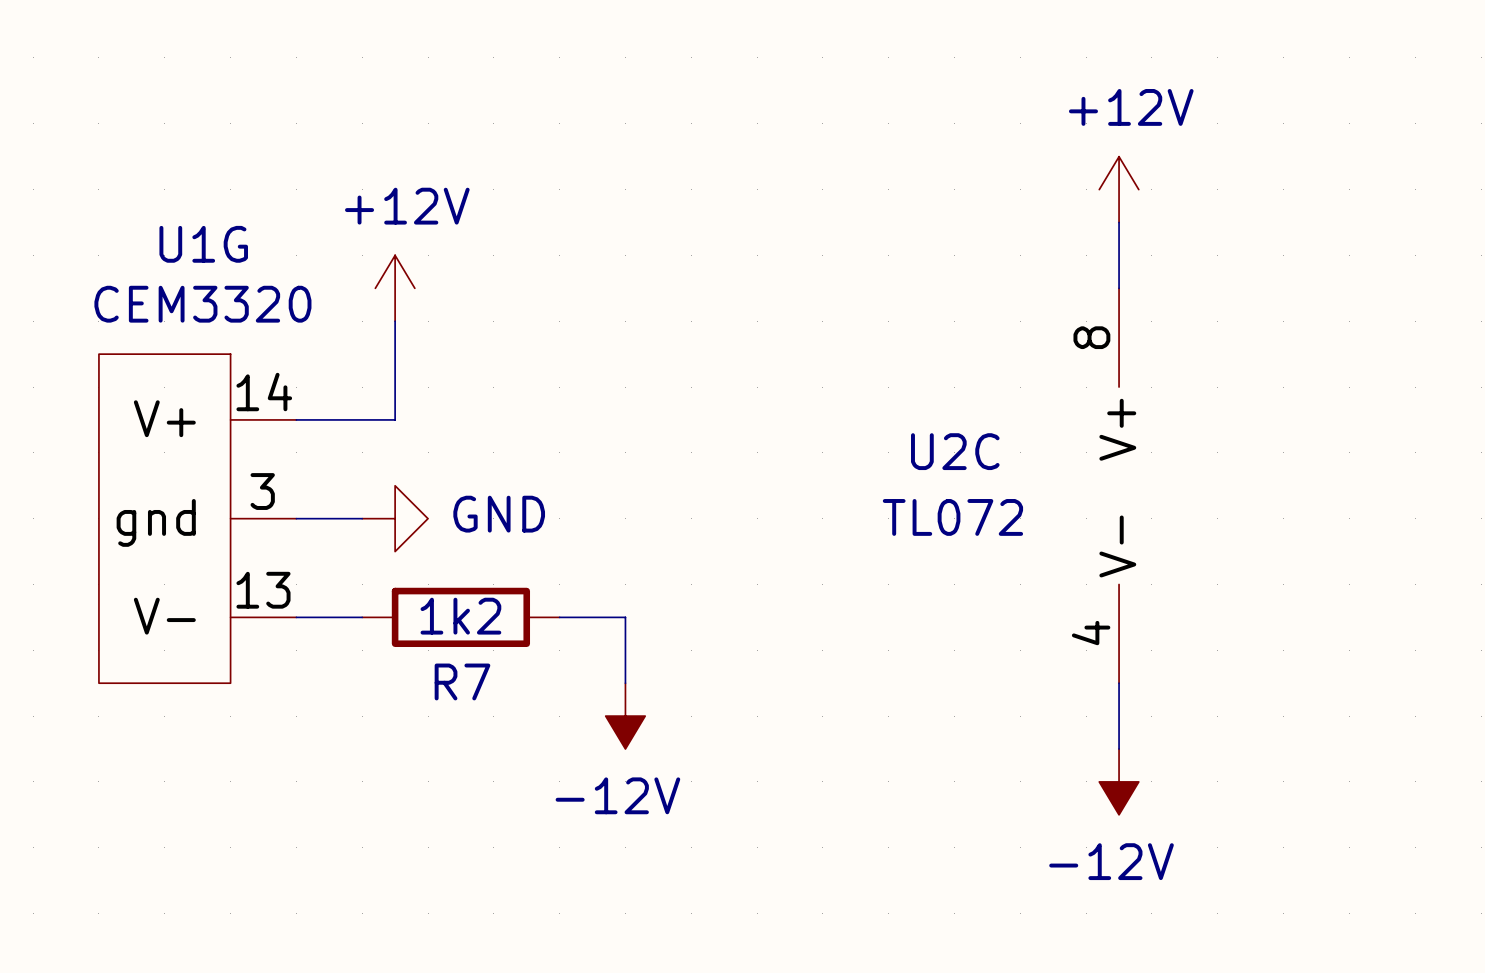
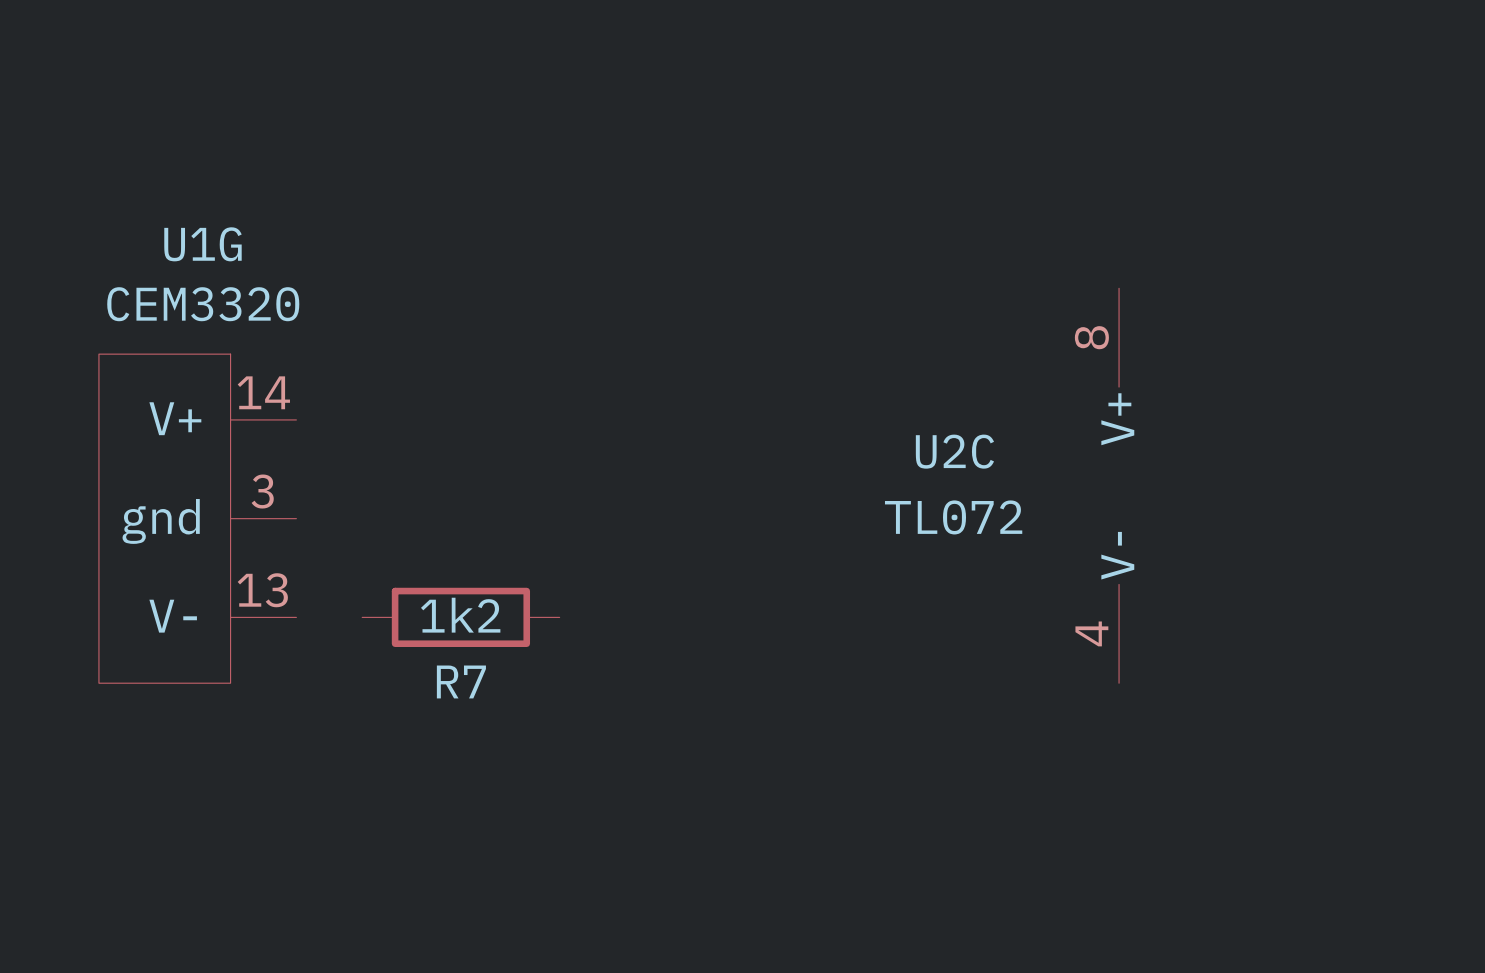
power symbol: +12V (1119, 189) -> none
wire: (1119, 222) (1119, 288) -> none
power symbol: +12V (395, 288) -> none
wire: (395, 321) (395, 419) (296, 419) -> none
wire: (296, 518) (362, 518) -> none
power symbol: GND (395, 518) -> none
wire: (296, 617) (362, 617) -> none
wire: (559, 617) (625, 617) (625, 683) -> none
wire: (1119, 683) (1119, 749) -> none
power symbol: -12V (625, 716) -> none
power symbol: -12V (1119, 781) -> none

